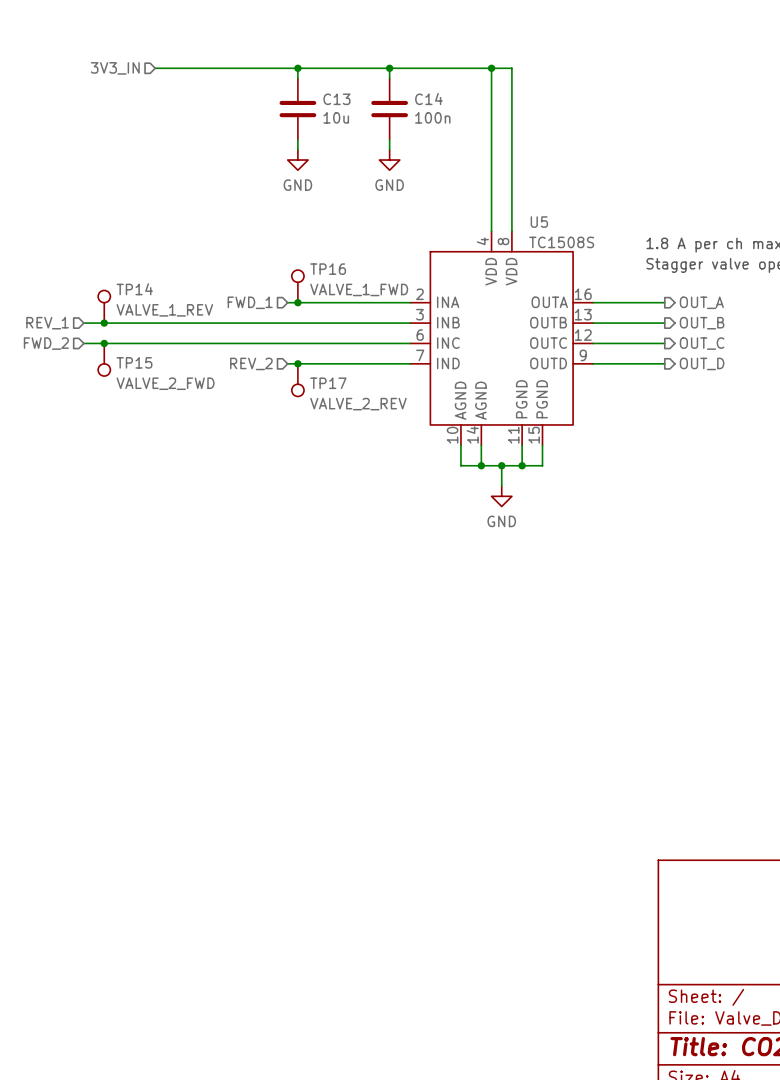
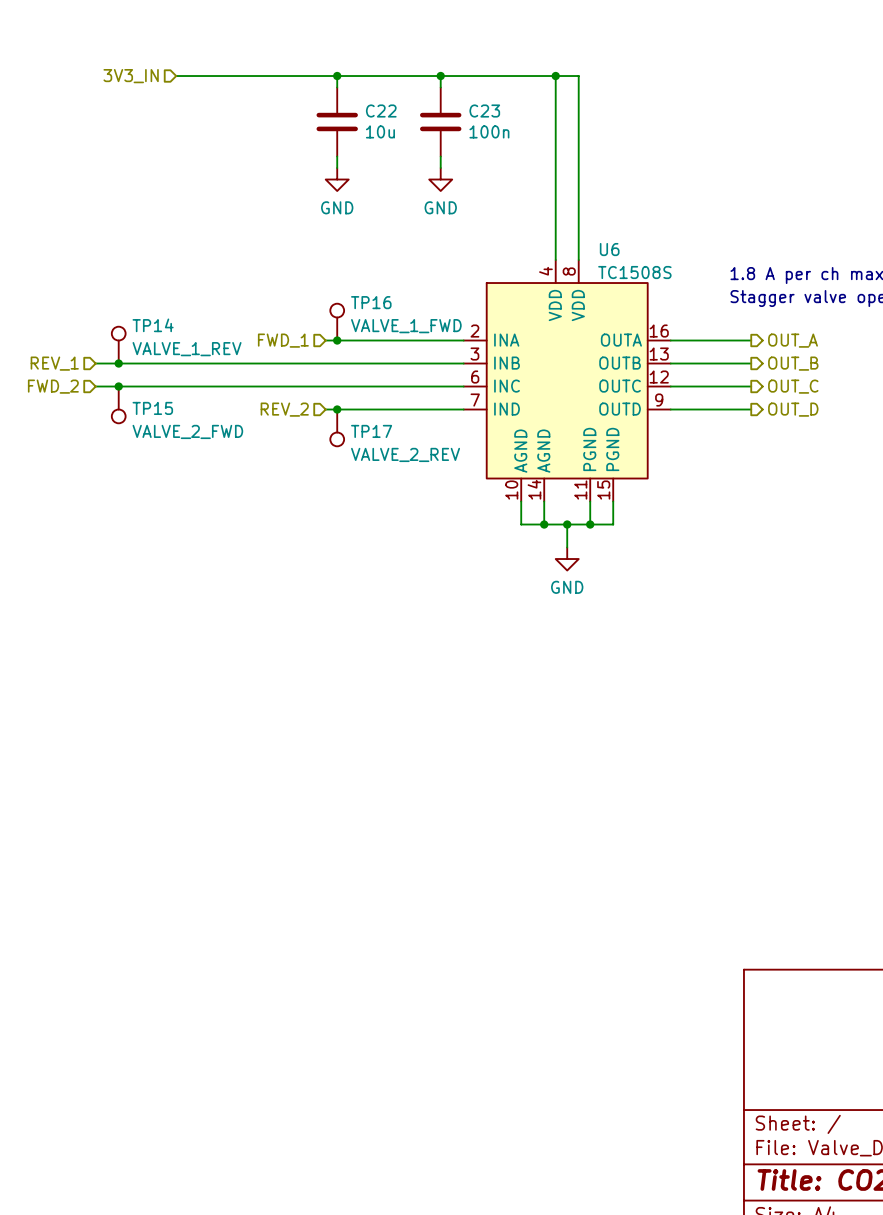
C13 name: C13 (336, 99) -> C22 (381, 111)
C14 name: C14 (428, 99) -> C23 (484, 111)
U5 name: U5 (539, 222) -> U6 (609, 249)

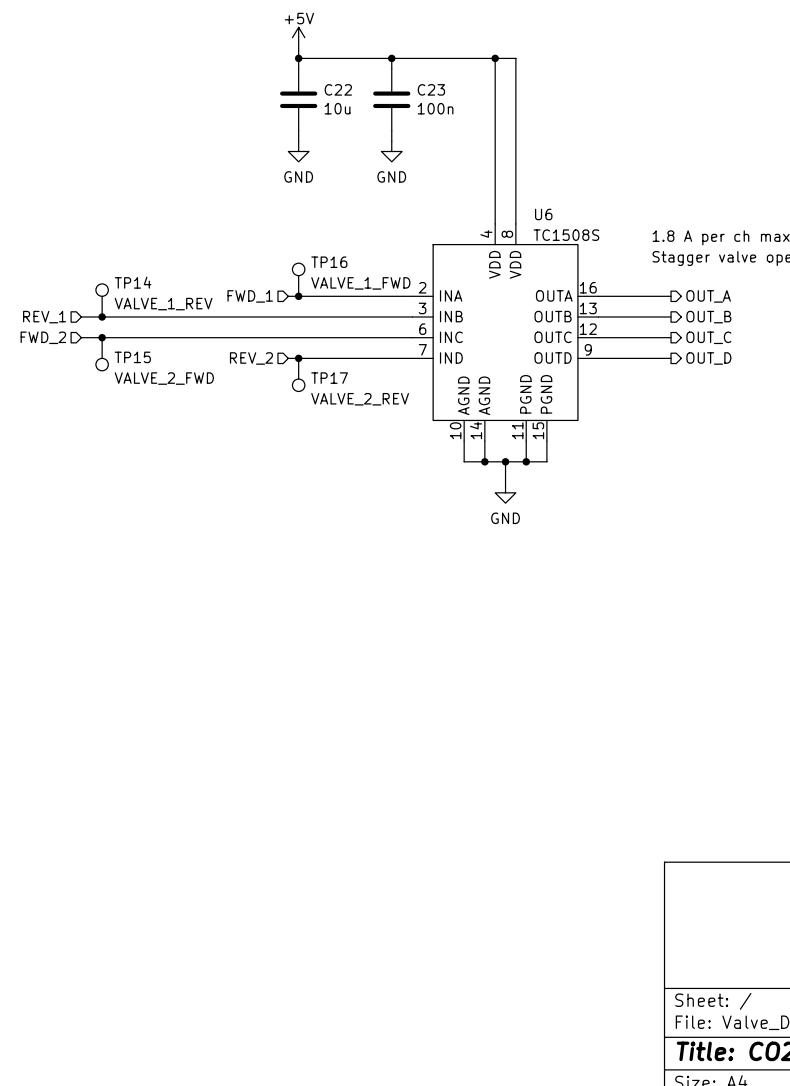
power symbol: none -> +5V (298, 37)
hierarchical label: 3V3_IN (131, 76) -> none
wire: (176, 76) (337, 76) -> (298, 48) (298, 58)

